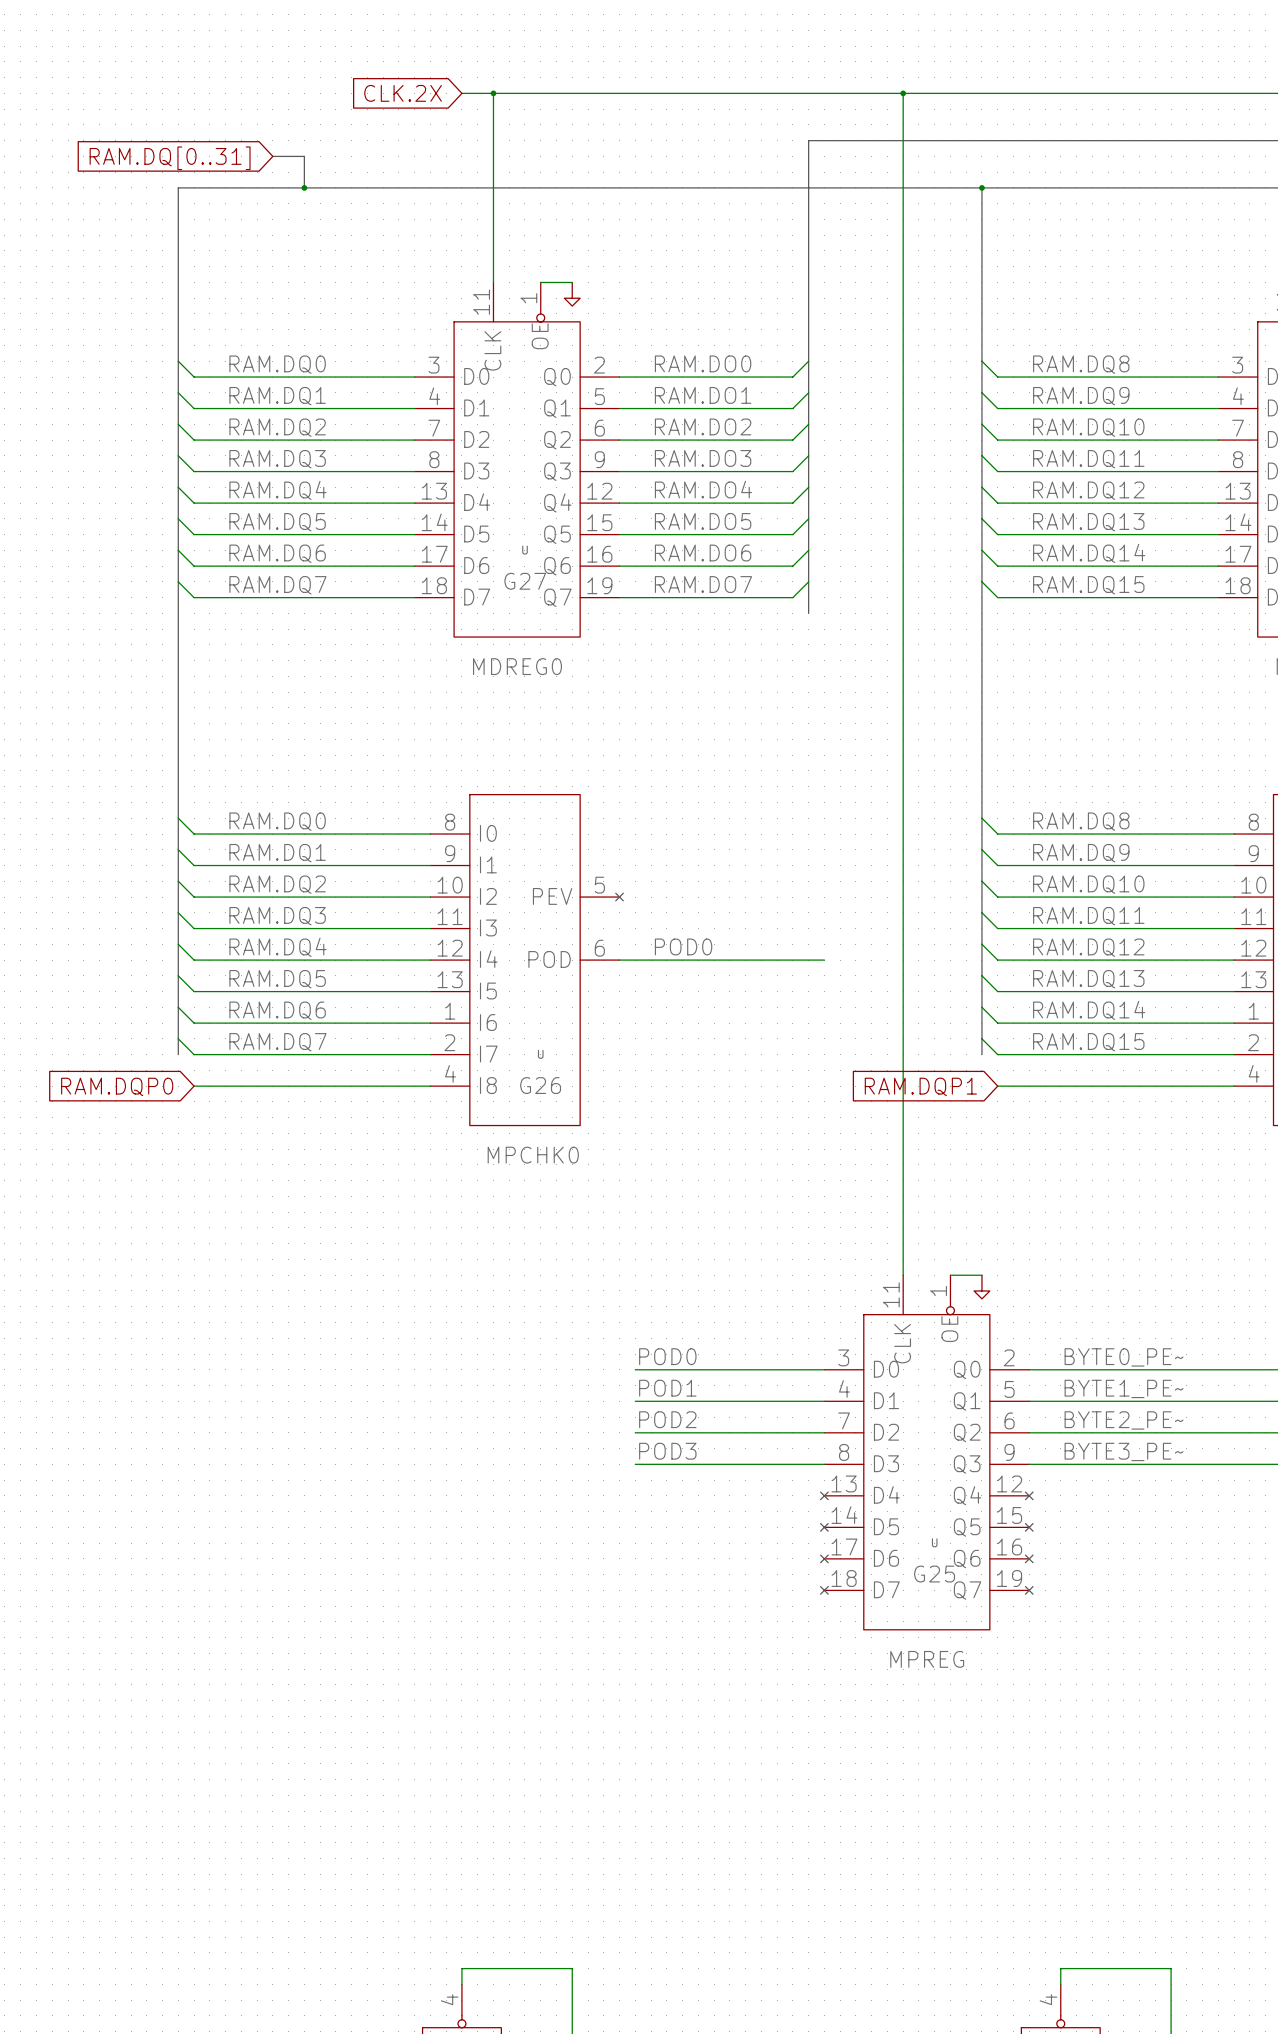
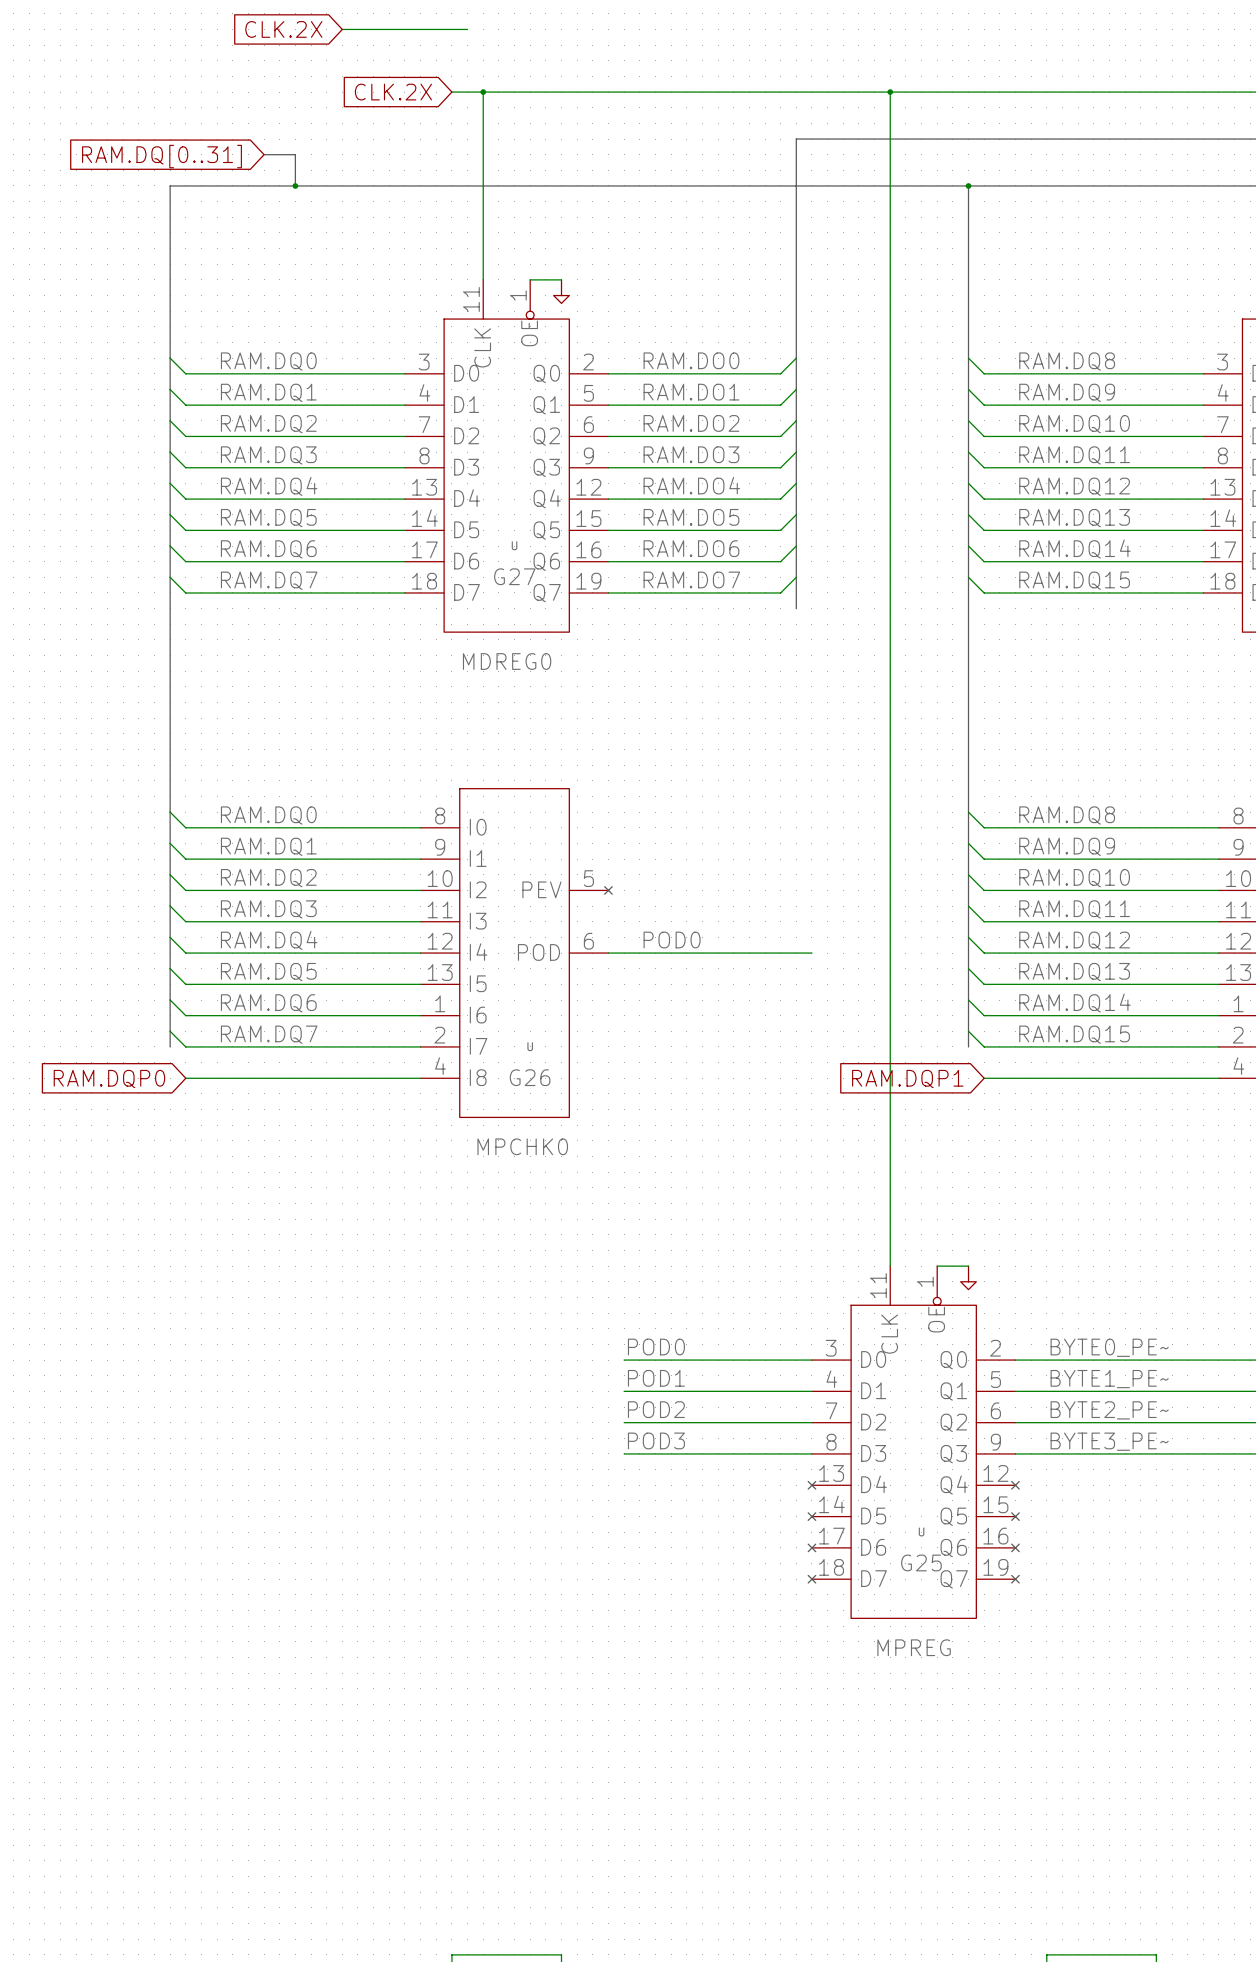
global label: none -> CLK.2X (283, 29)
wire: none -> (342, 29) (467, 29)

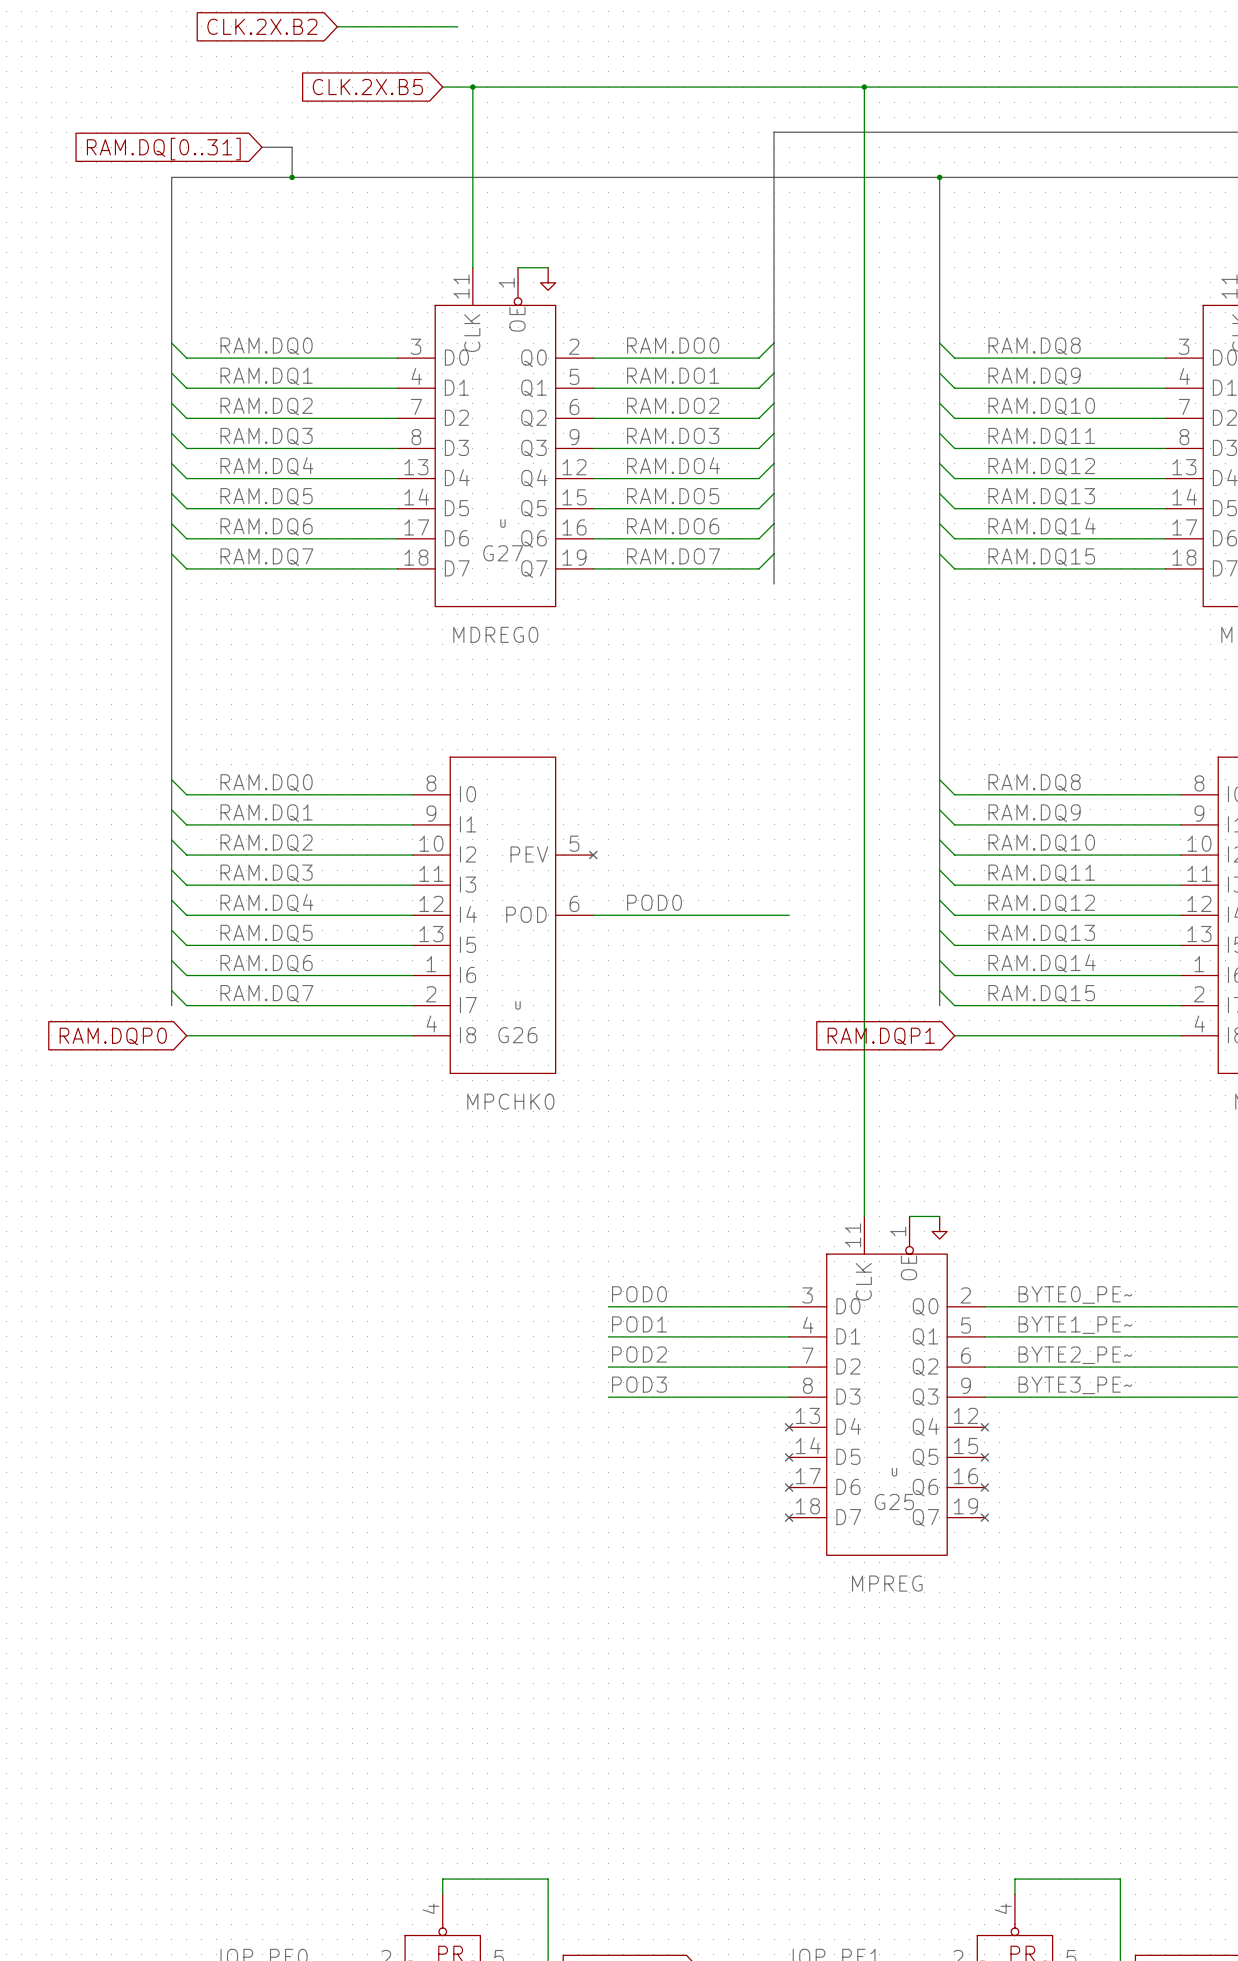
global label: CLK.2X (283, 29) -> CLK.2X.B2 (262, 26)
global label: CLK.2X (393, 92) -> CLK.2X.B5 (367, 87)

